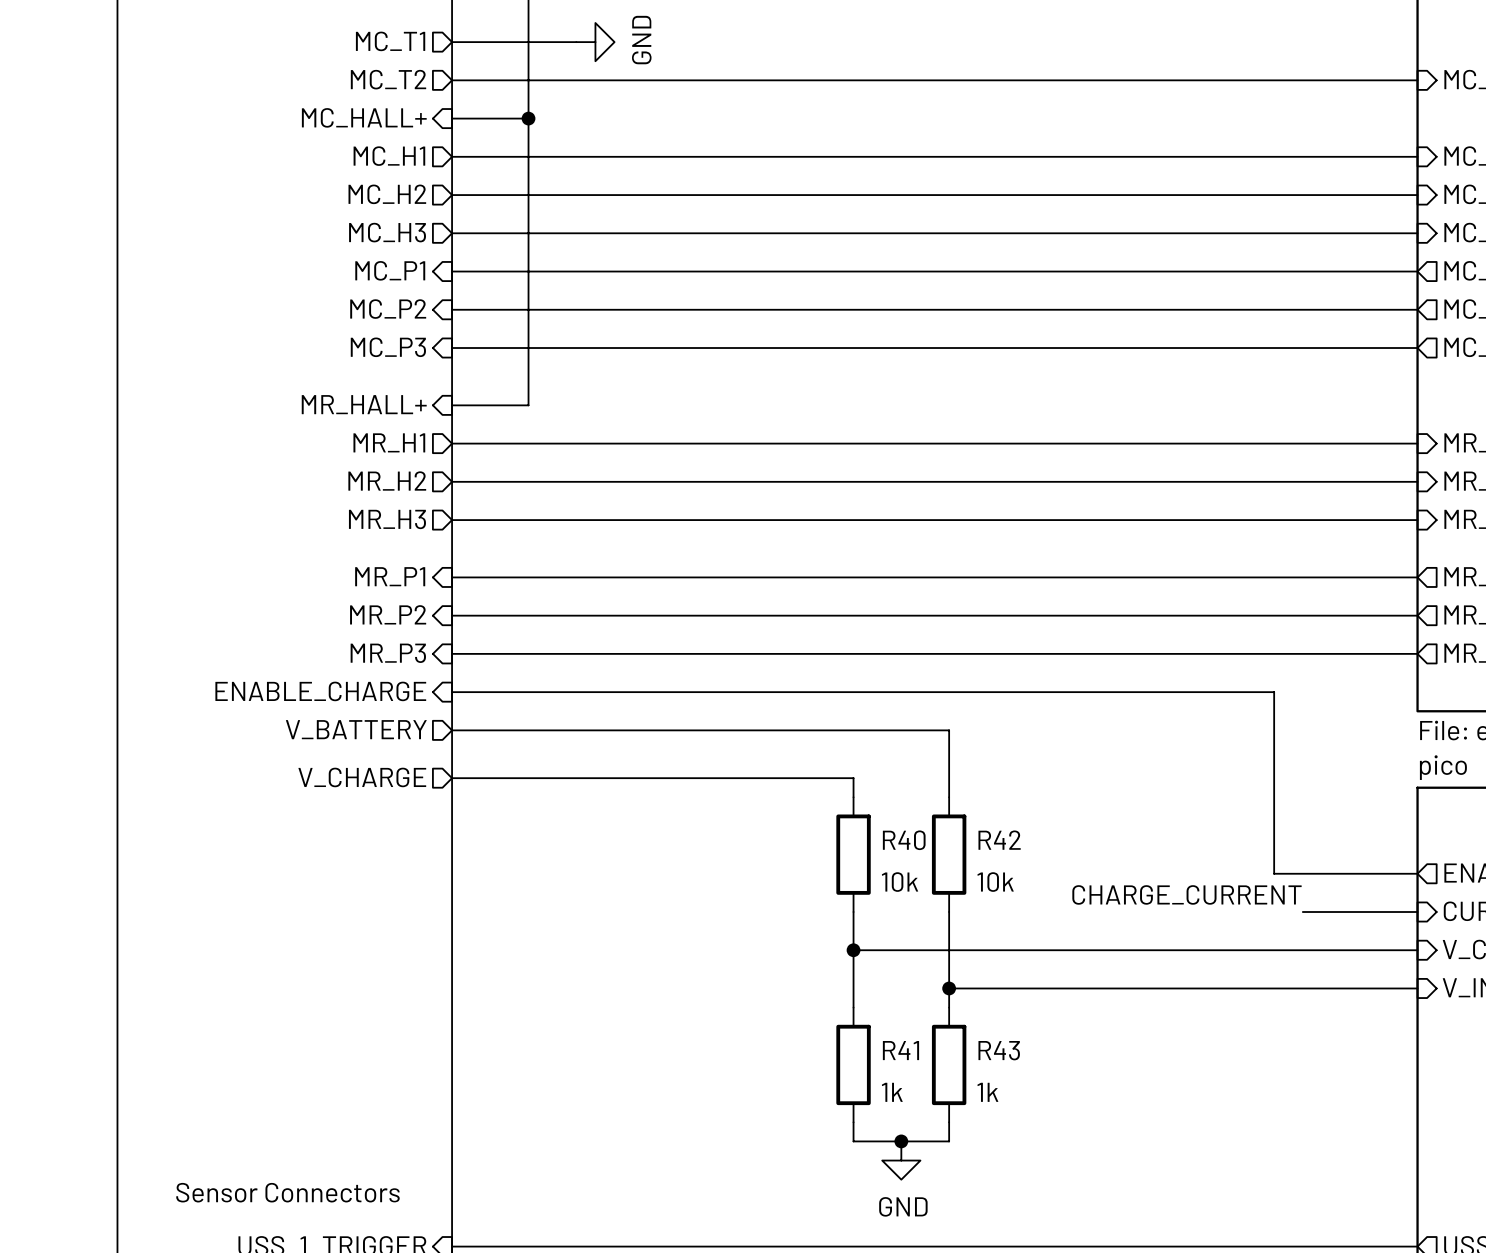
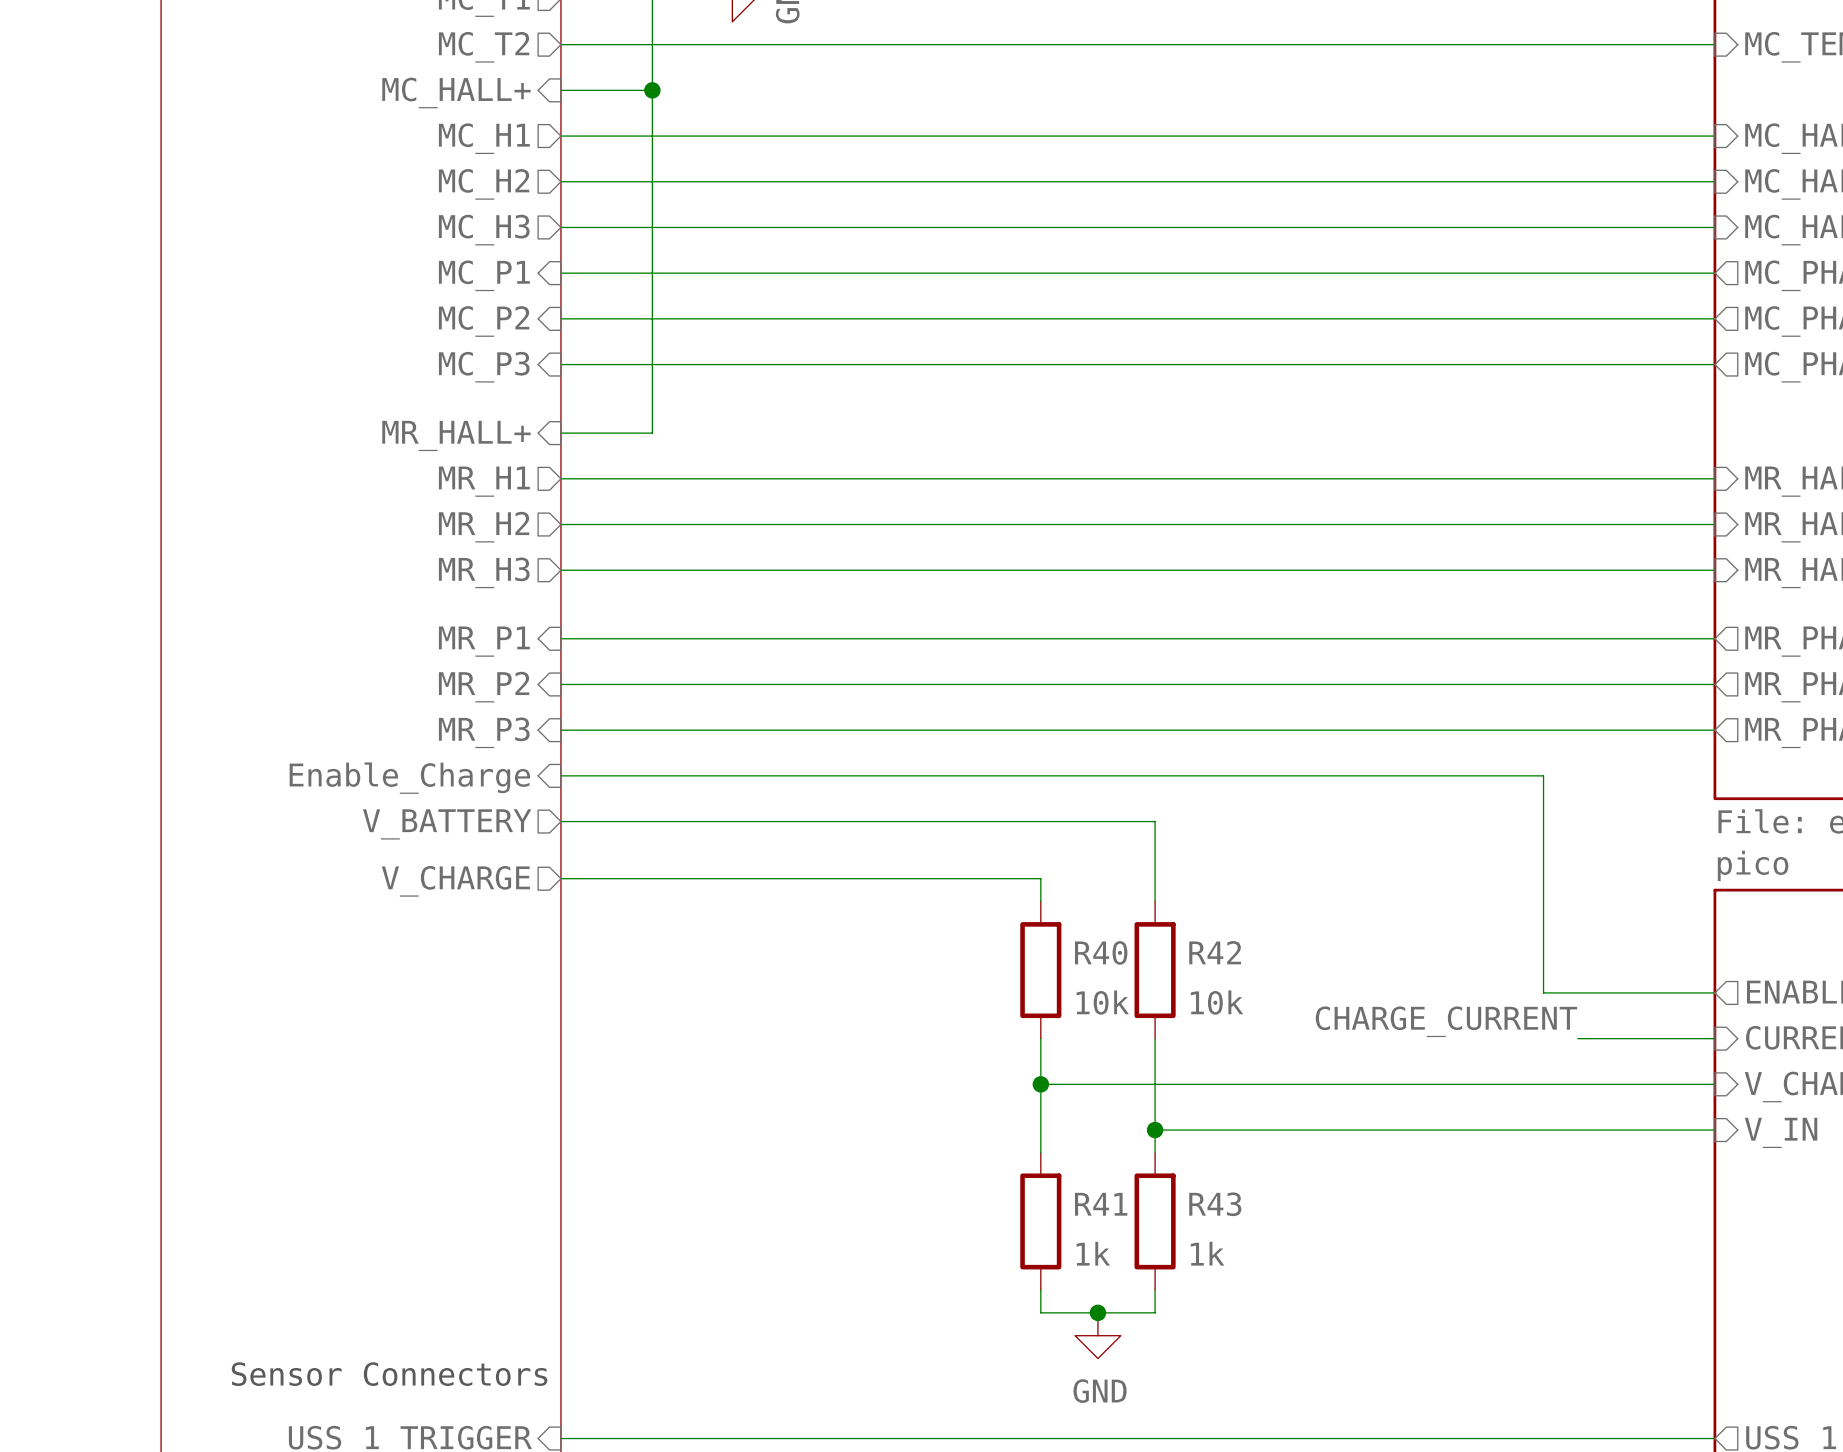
sheet pin: ENABLE_CHARGE (320, 691) -> Enable_Charge (409, 778)

